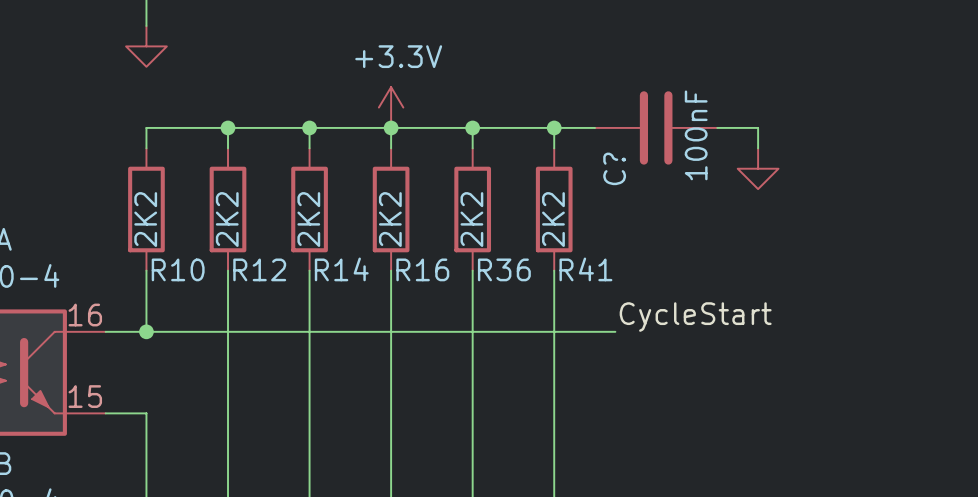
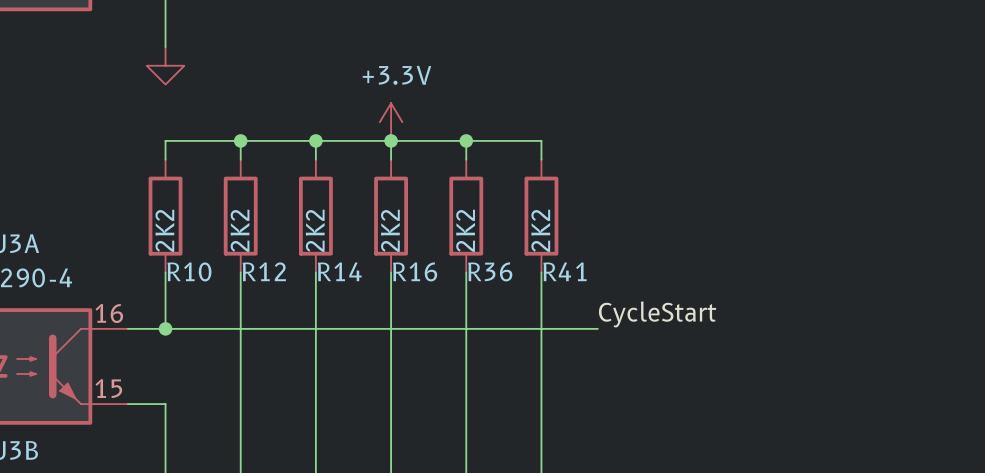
wire: (554, 127) (595, 127) -> none
junction: (554, 127) -> none
C?: 100nF (656, 127) -> none
wire: (717, 127) (758, 127) (758, 148) -> none
power symbol: (758, 168) -> none

